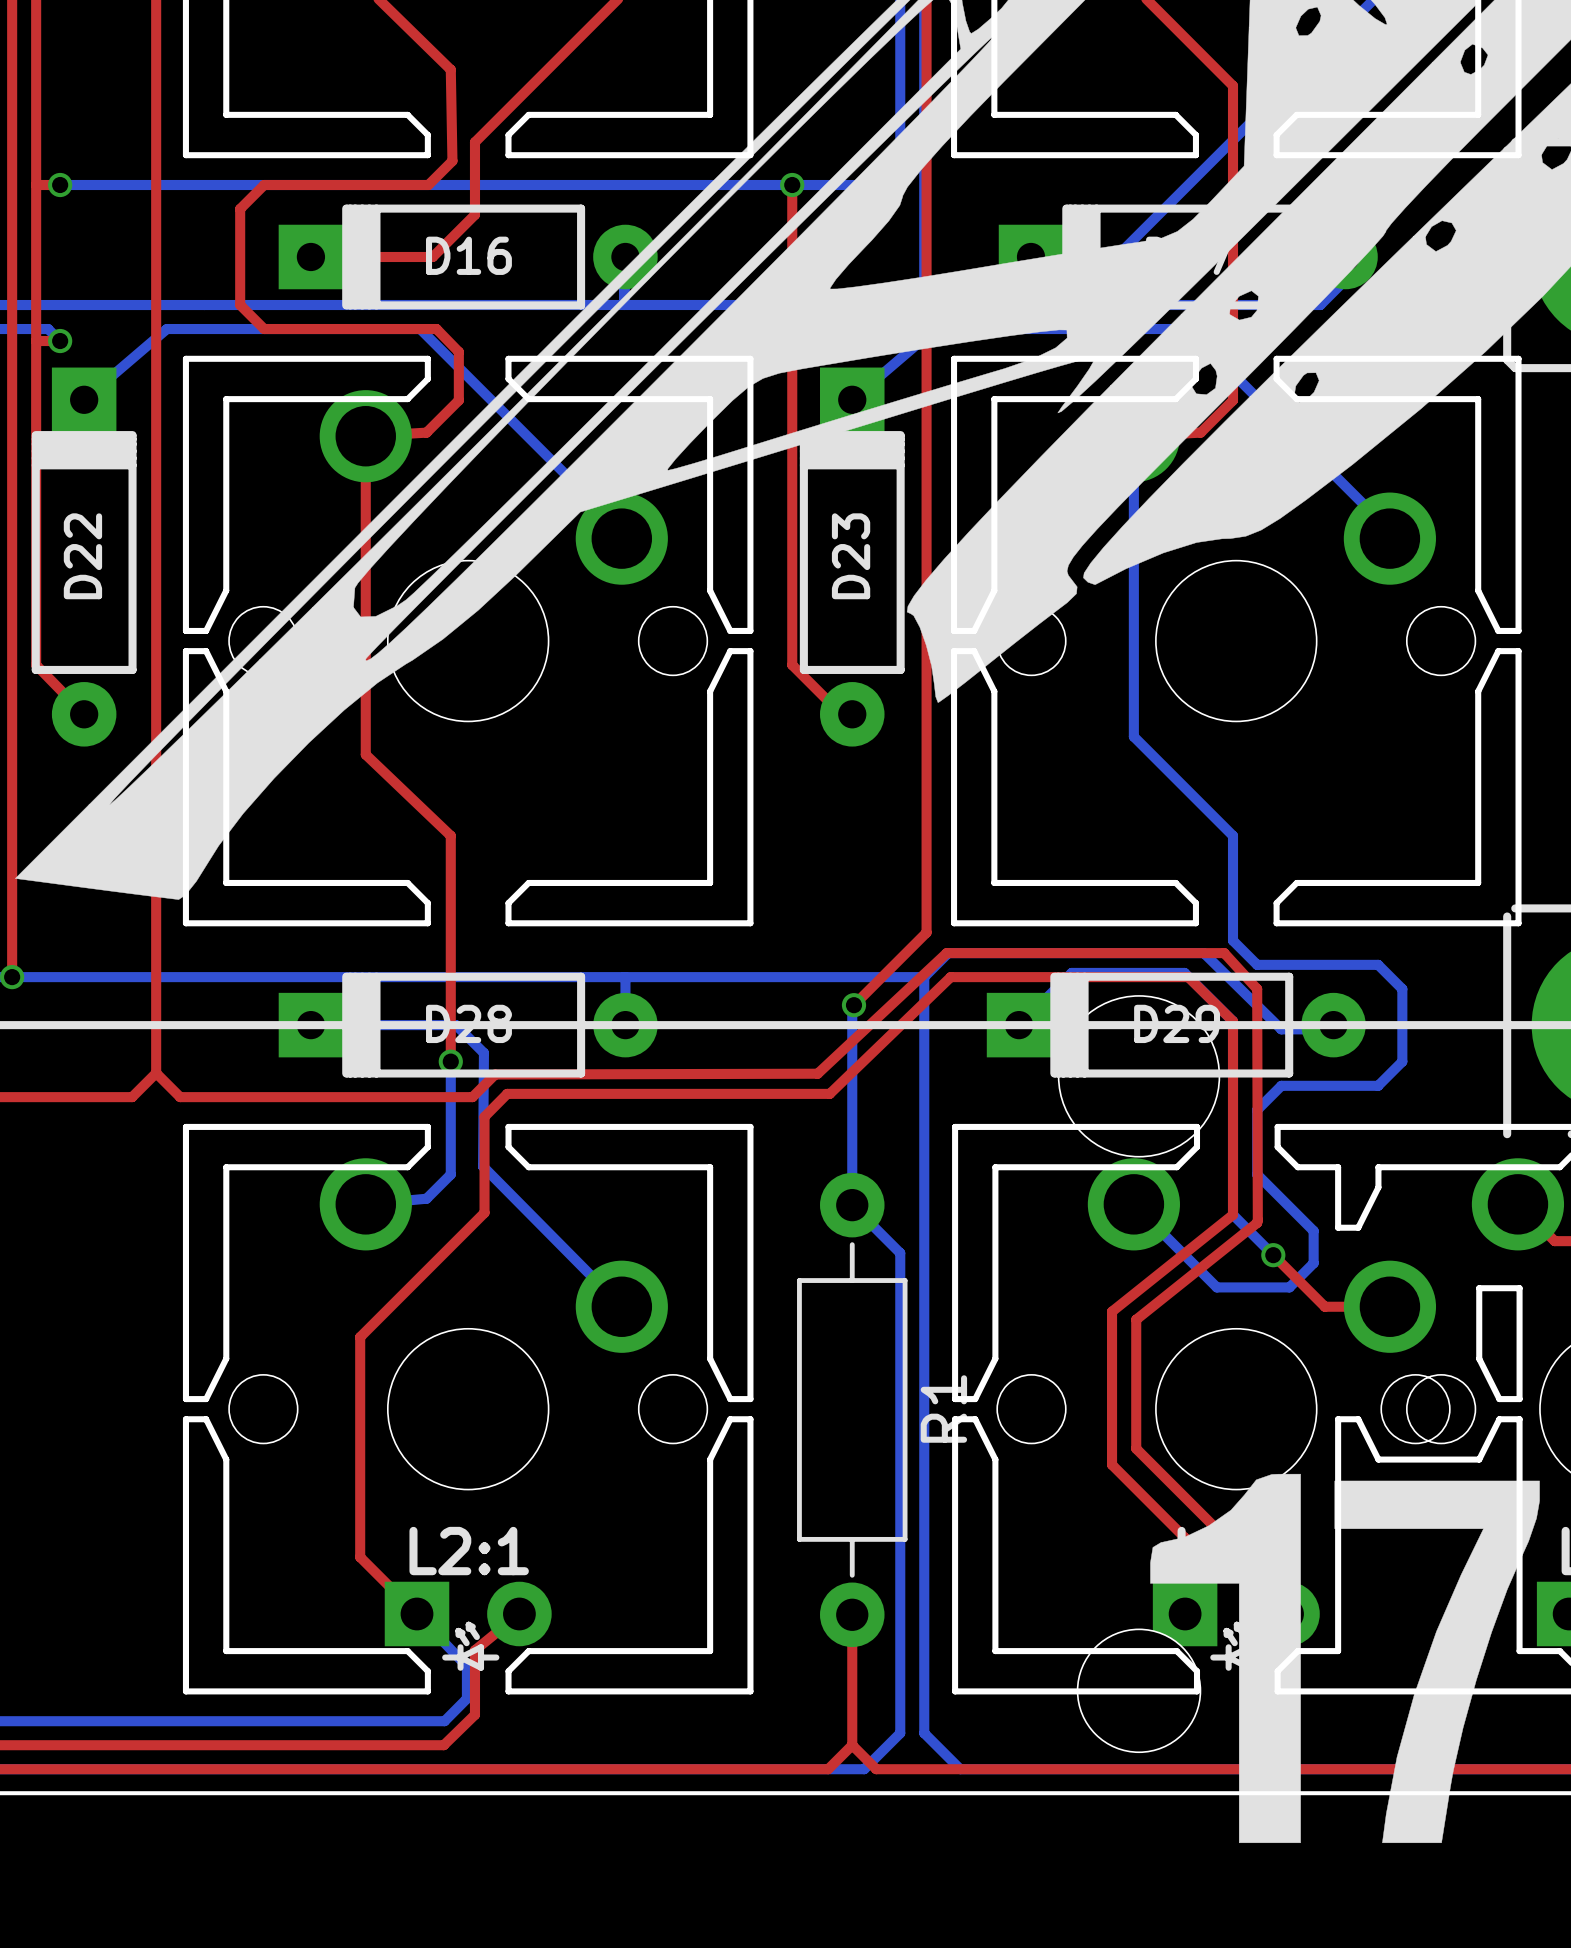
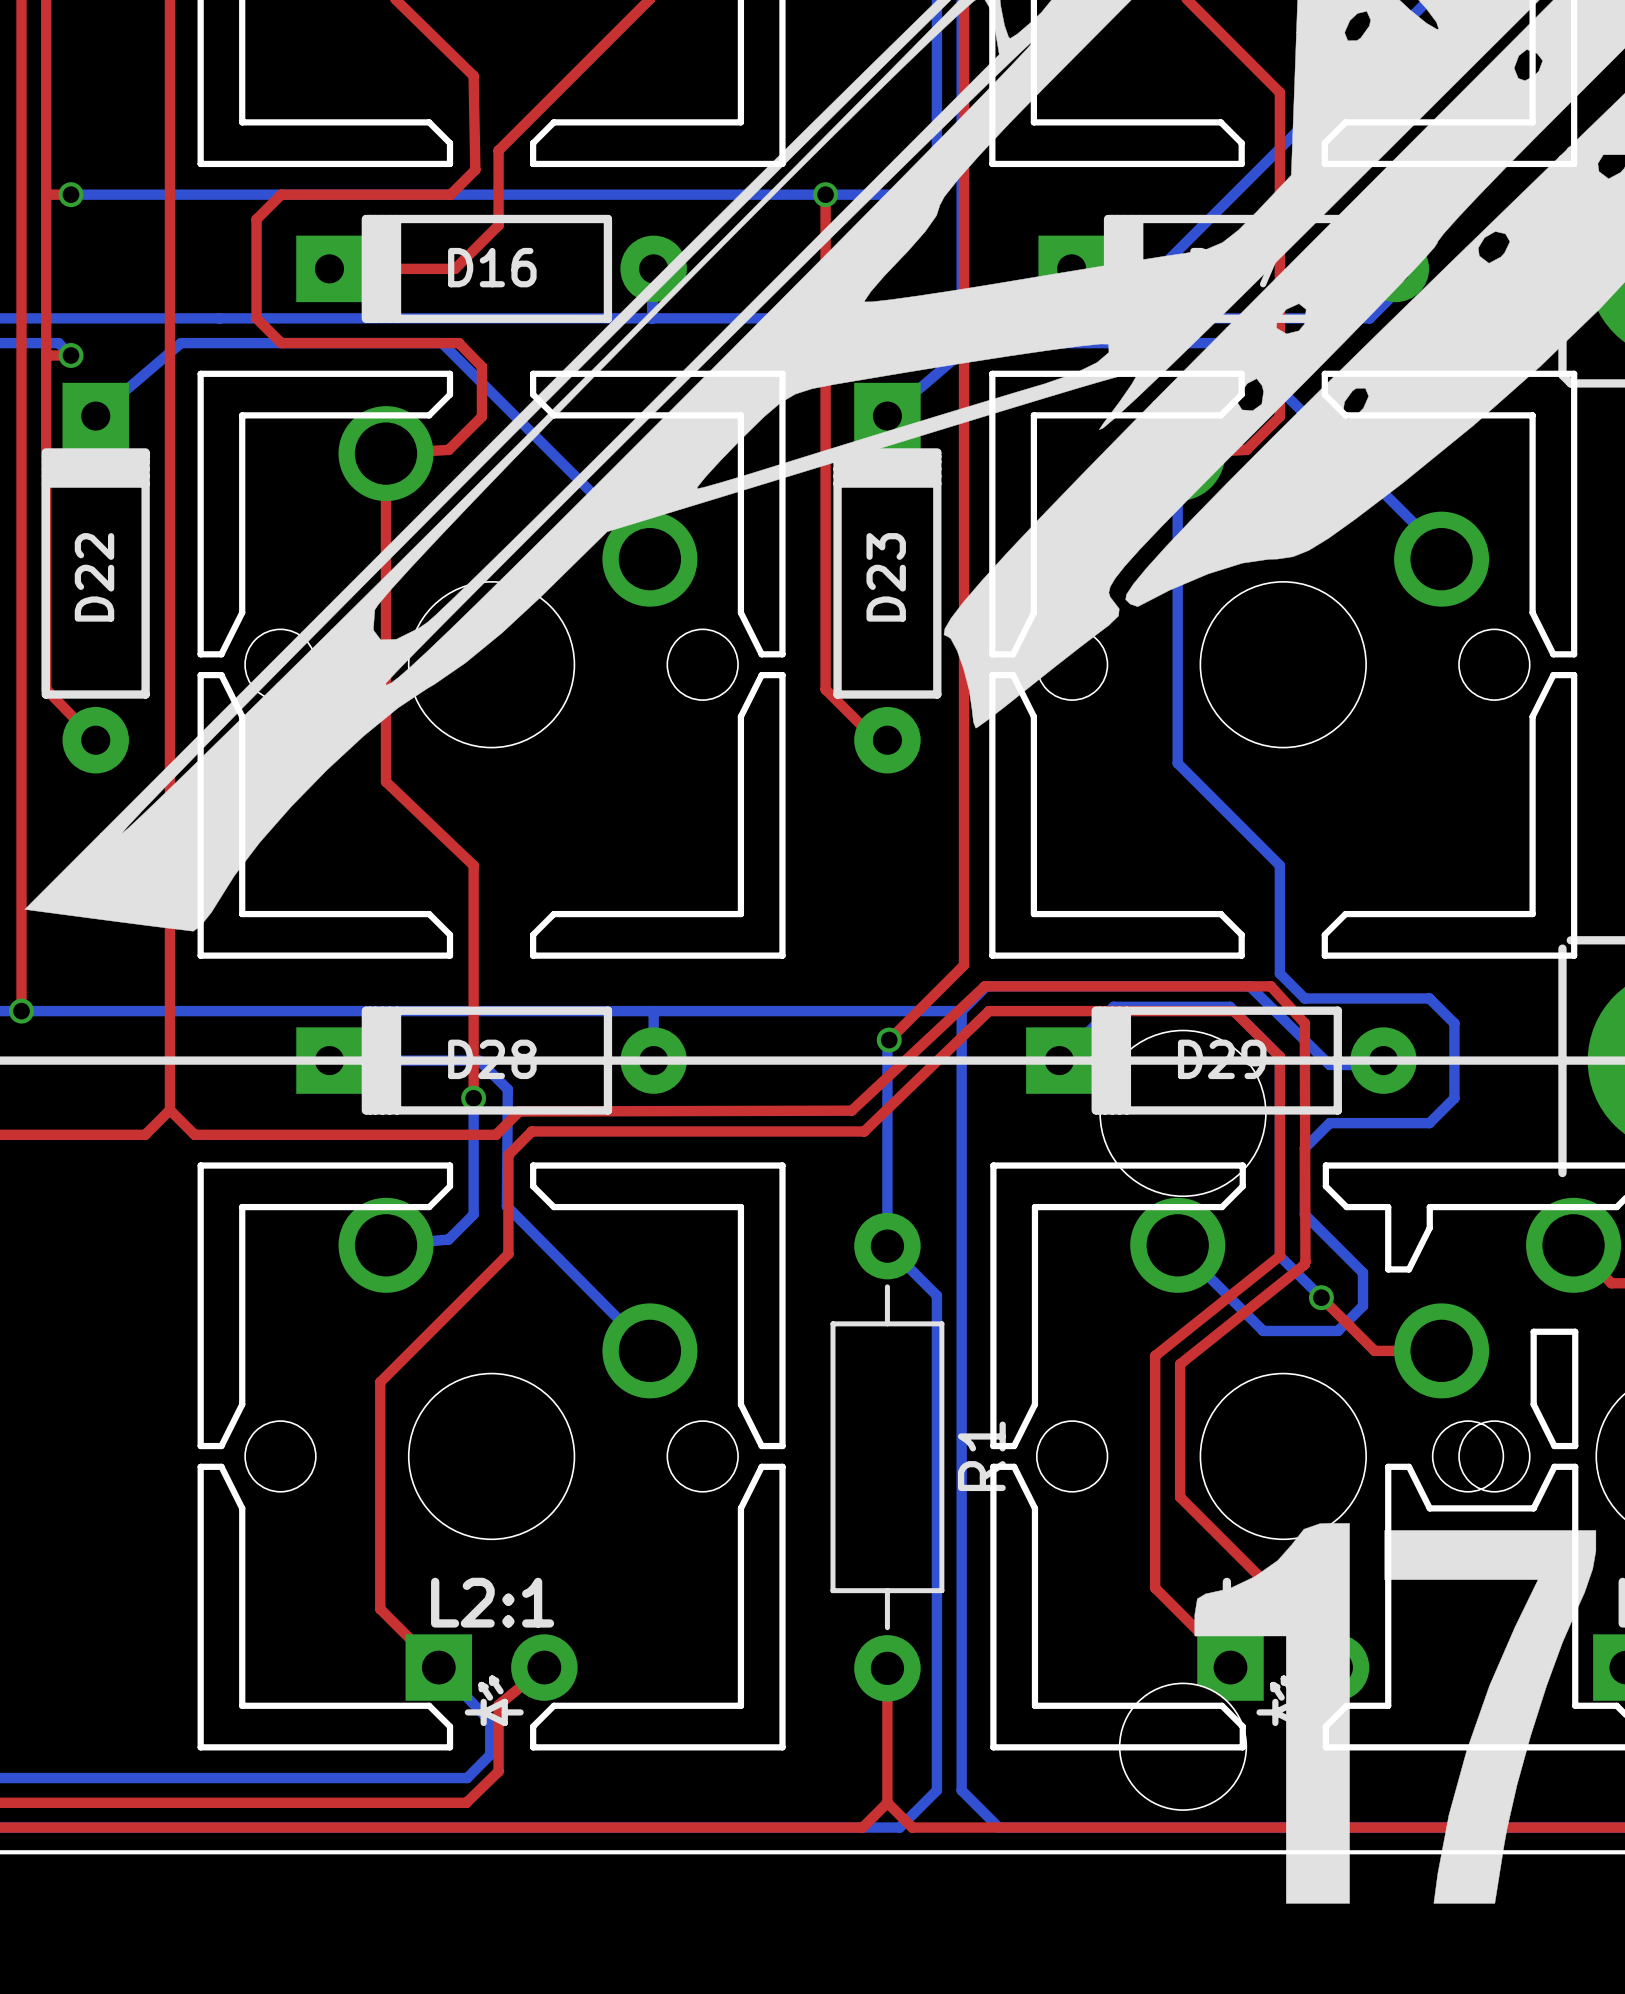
top track: (1112, 1464) (1185, 1537) (1185, 1609) -> (1155, 1513) (1155, 1588) (1230, 1663)

